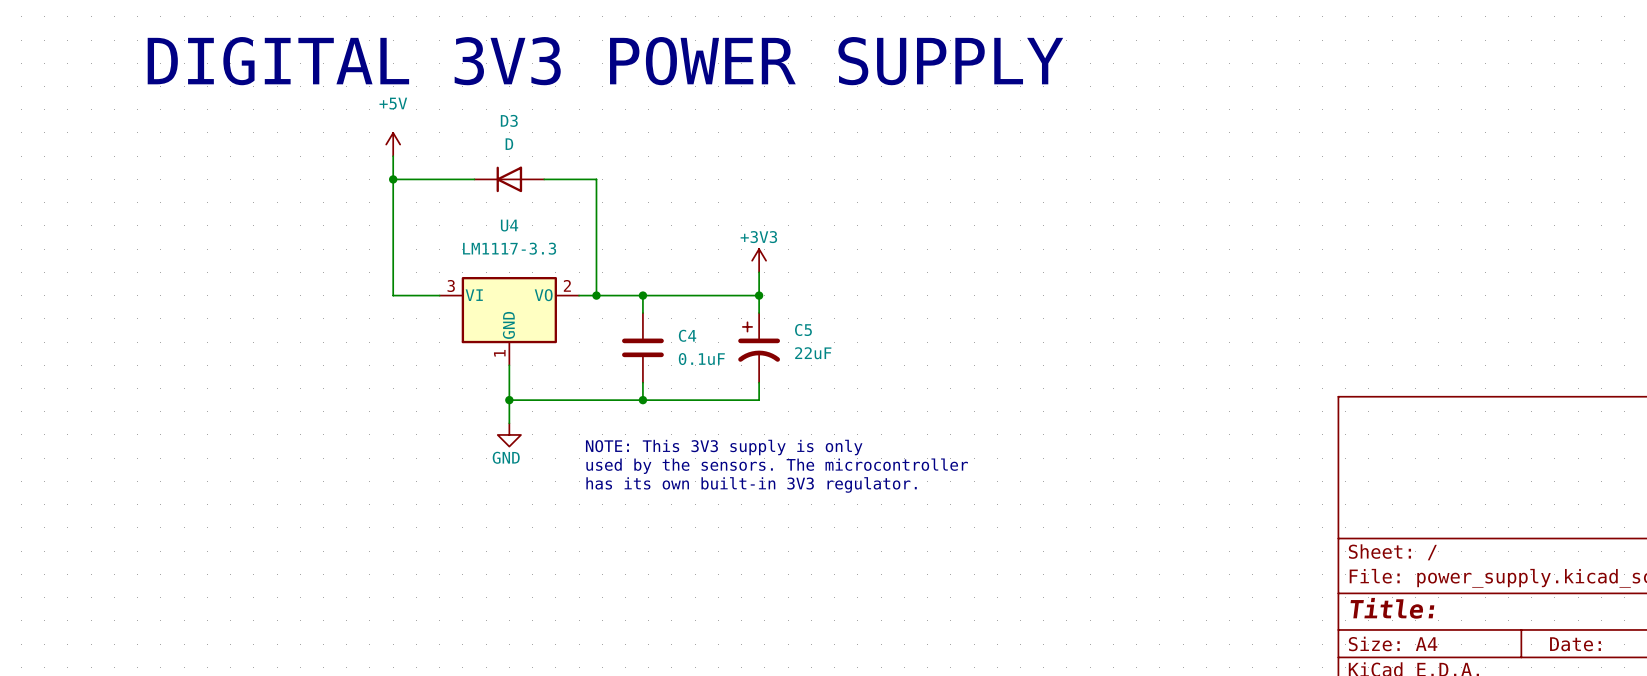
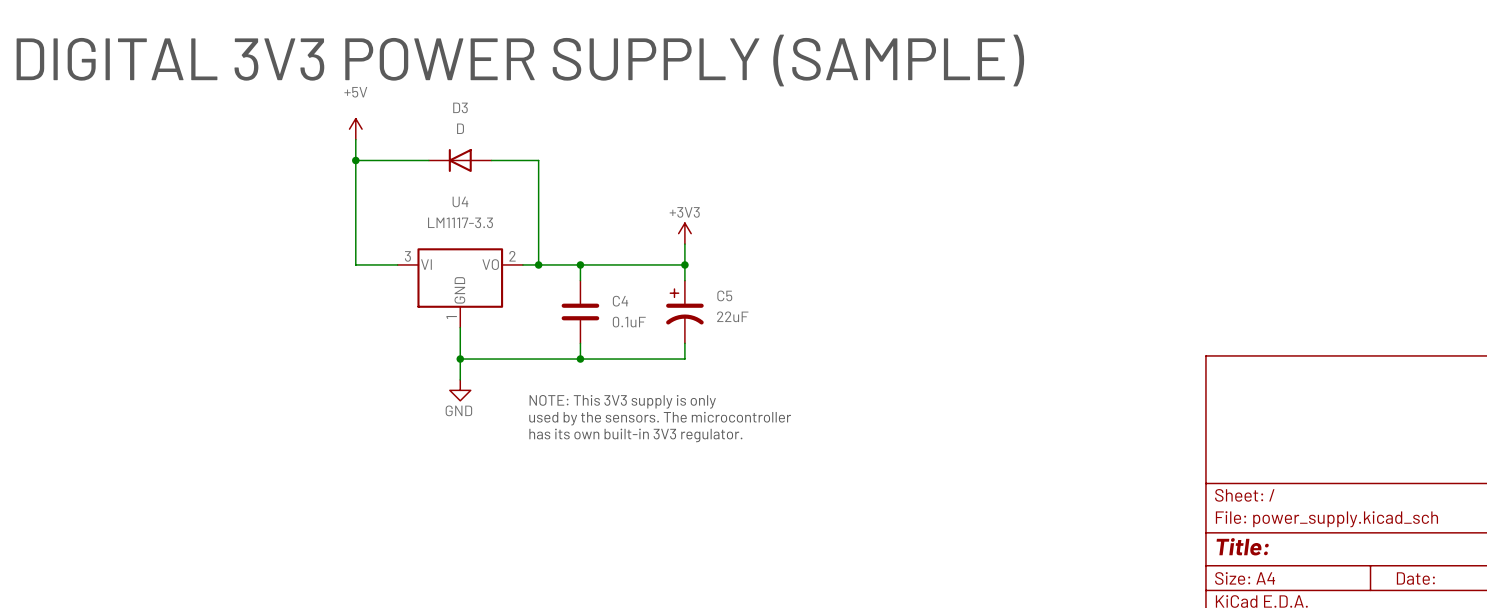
text: DIGITAL 3V3 POWER SUPPLY (605, 61) -> DIGITAL 3V3 POWER SUPPLY (SAMPLE) (520, 60)

